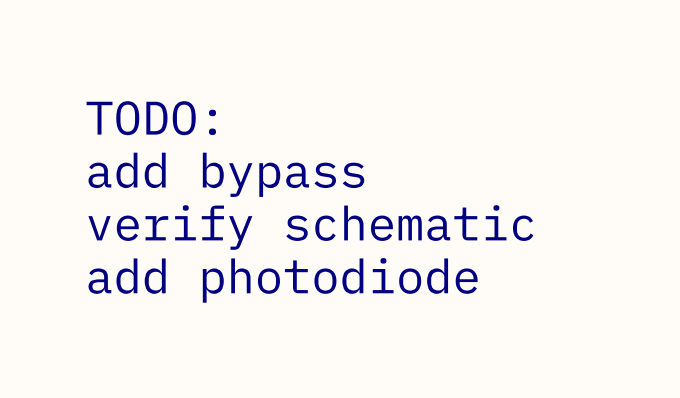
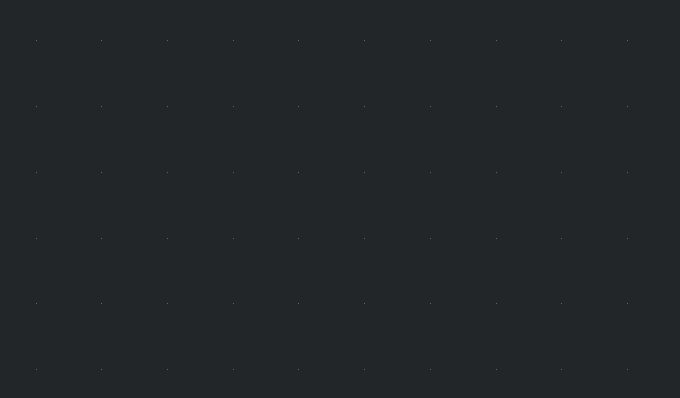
text: TODO: (151, 118) -> none
text: add bypass (226, 174) -> none
text: verify schematic (310, 227) -> none
text: add photodiode (283, 280) -> none

